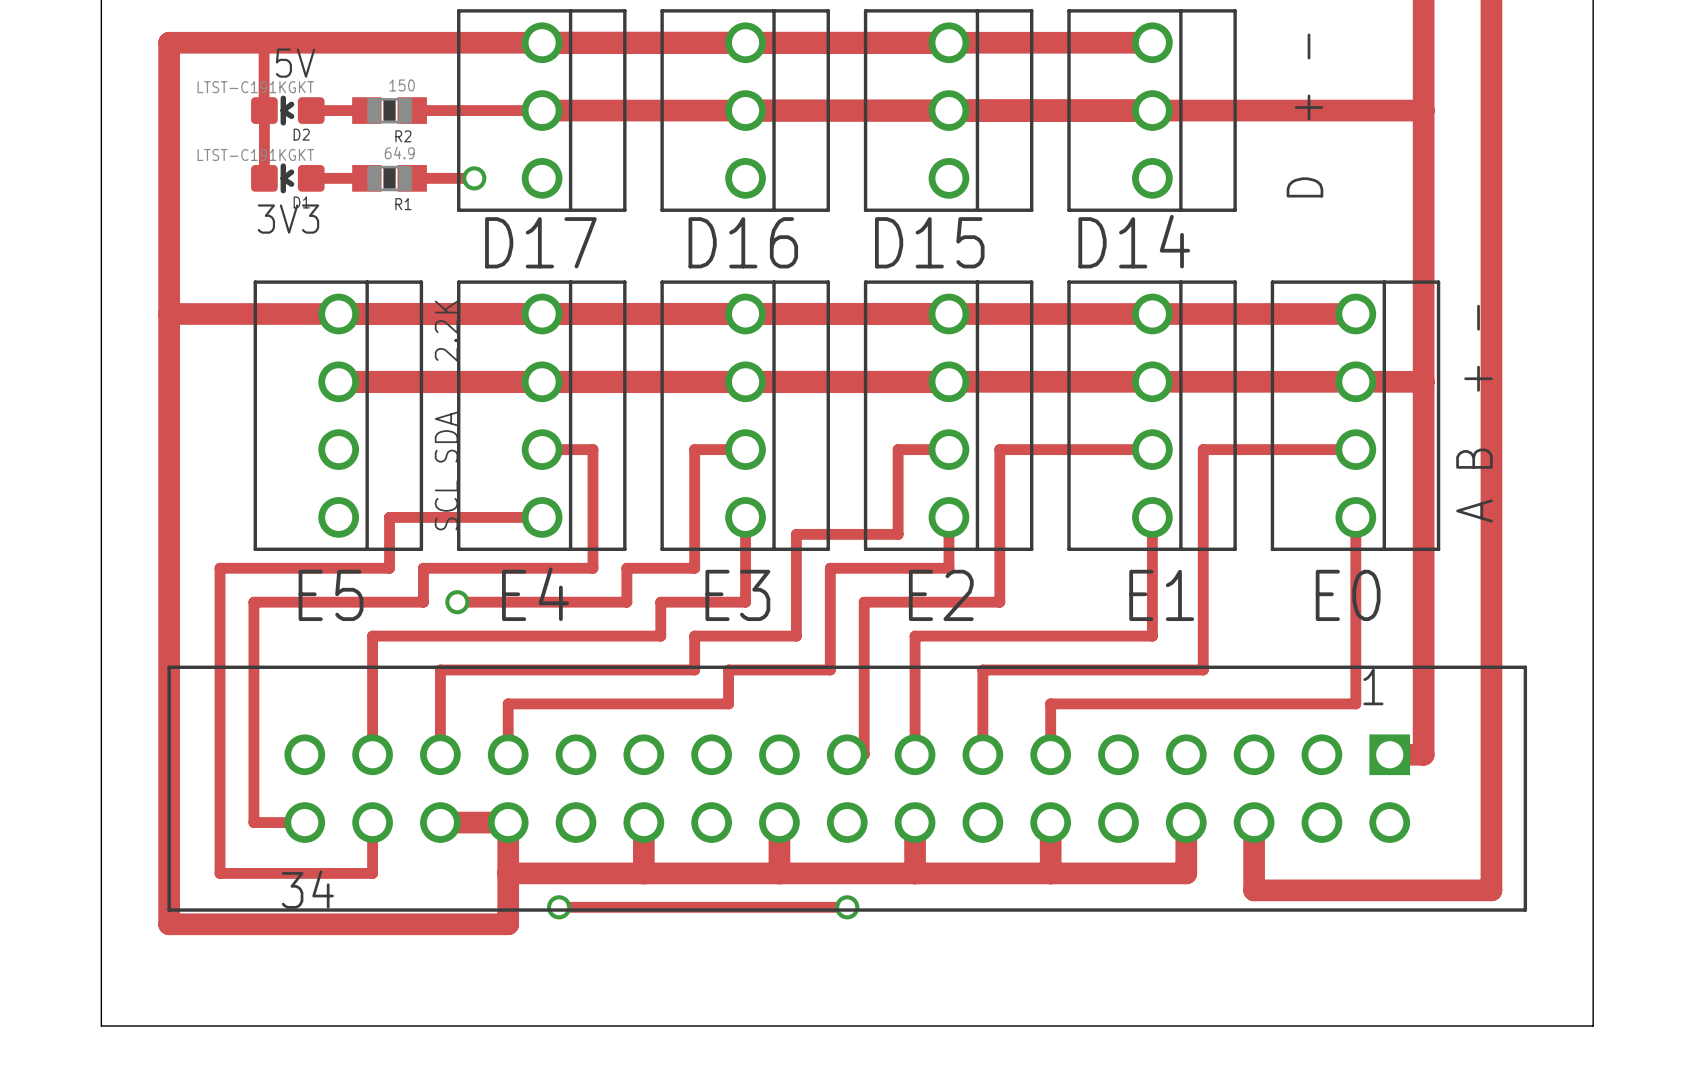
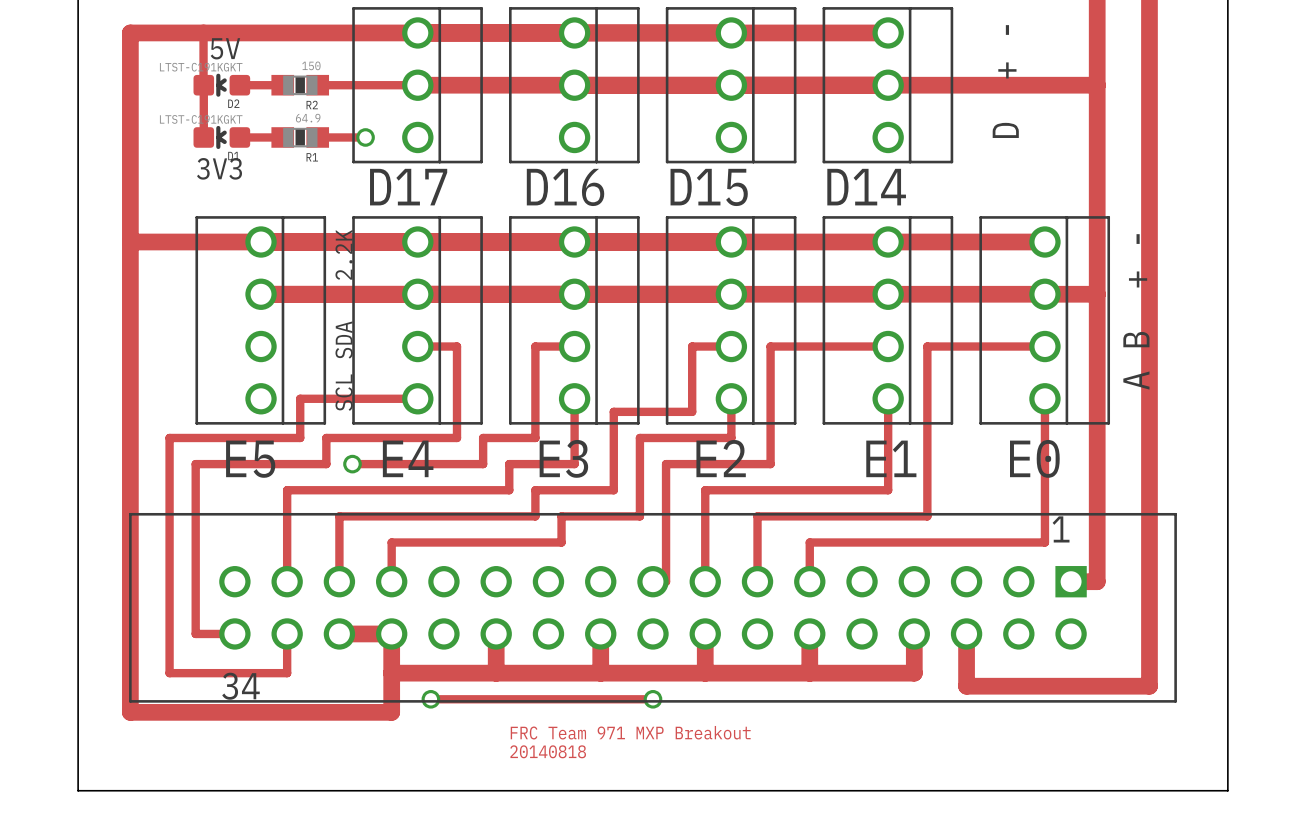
text: none -> FRC Team 971 MXP Breakout (630, 732)
text: none -> 20140818 (548, 751)

